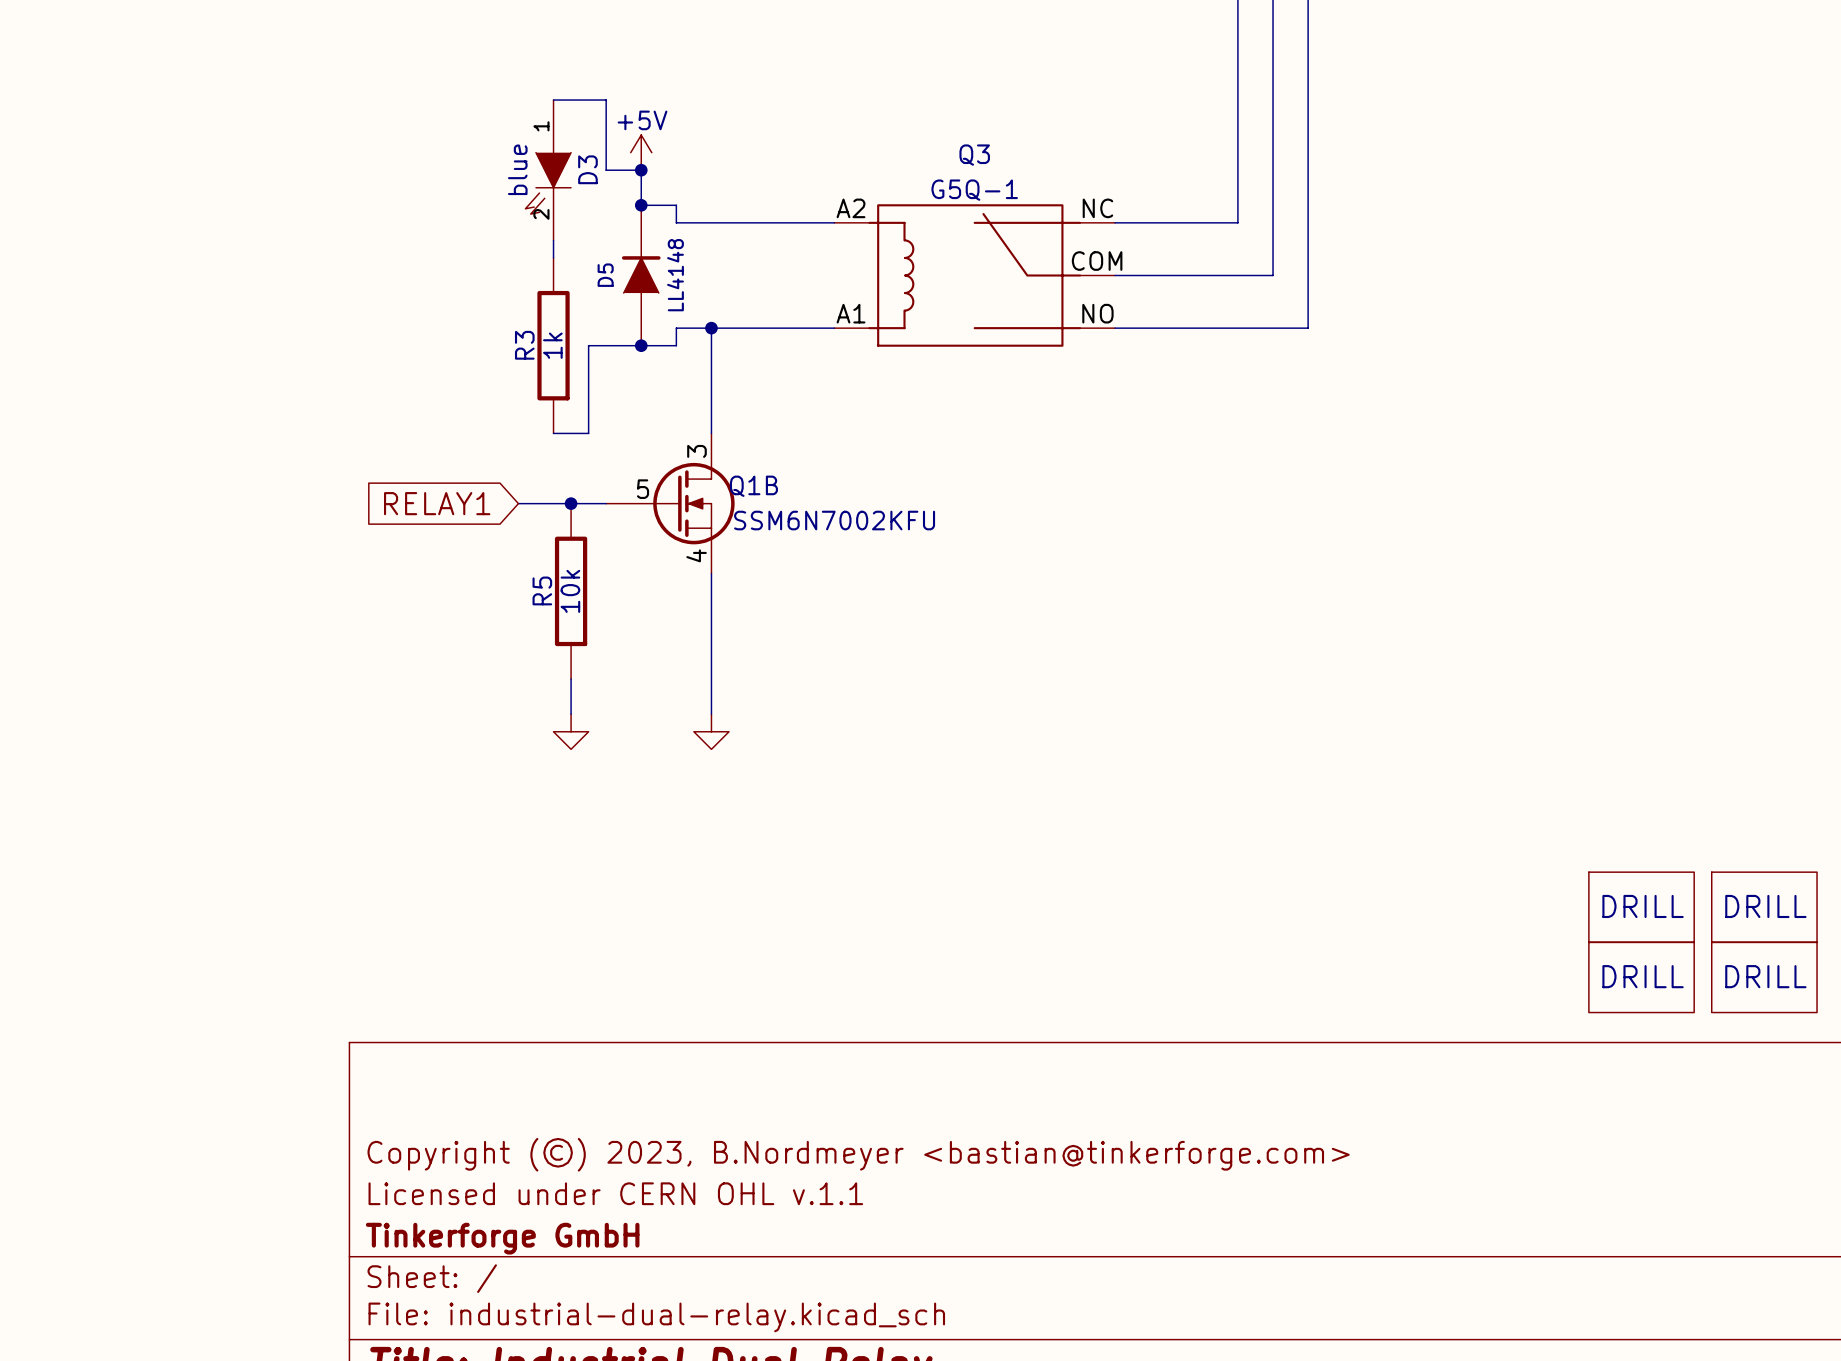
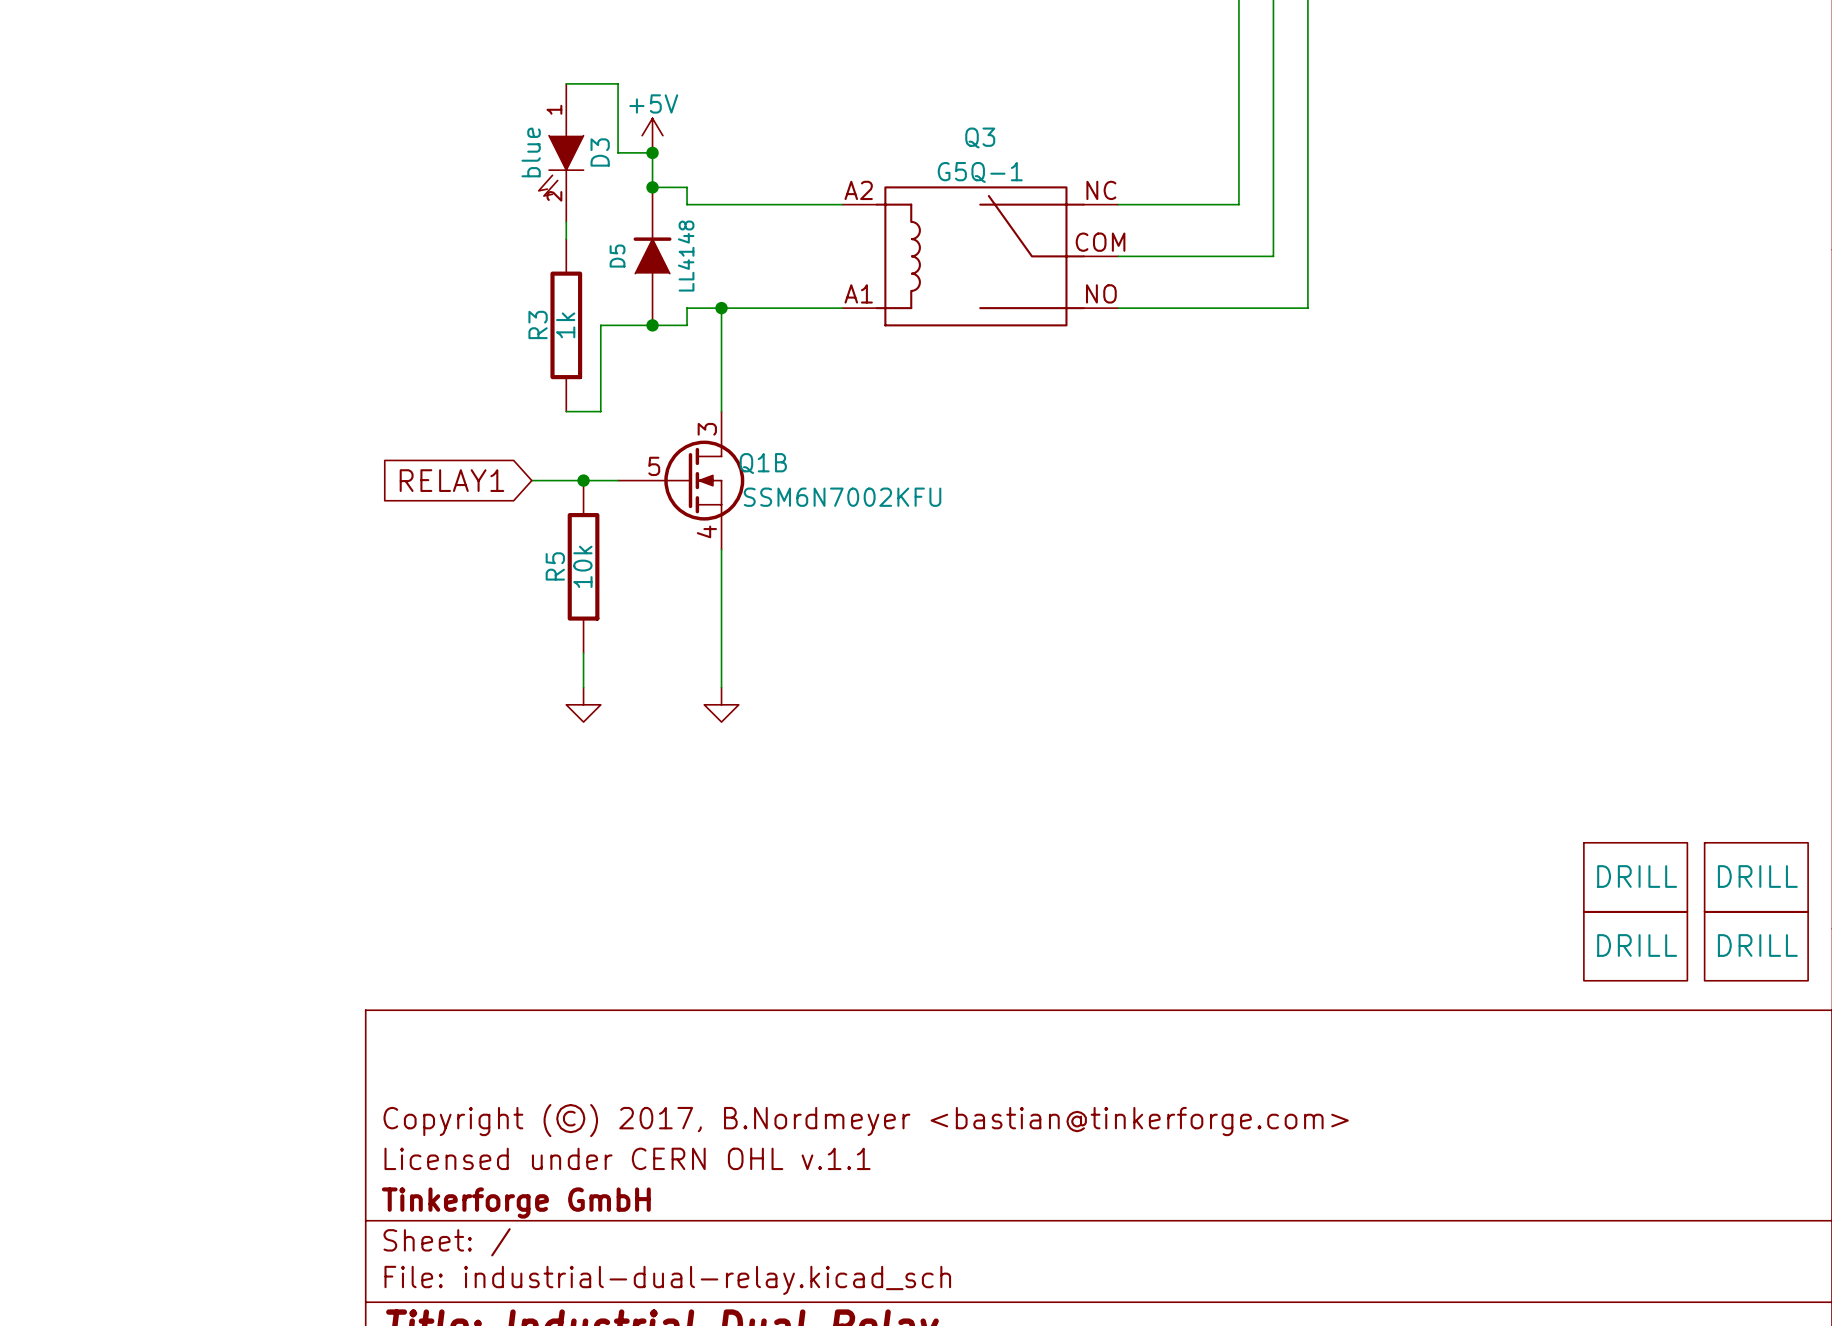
title block: Copyright (©) 2023, B.Nordmeyer <bastian@tinkerforge.com> (858, 1154) -> Copyright (©) 2017, B.Nordmeyer <bastian@tinkerforge.com> (866, 1120)

